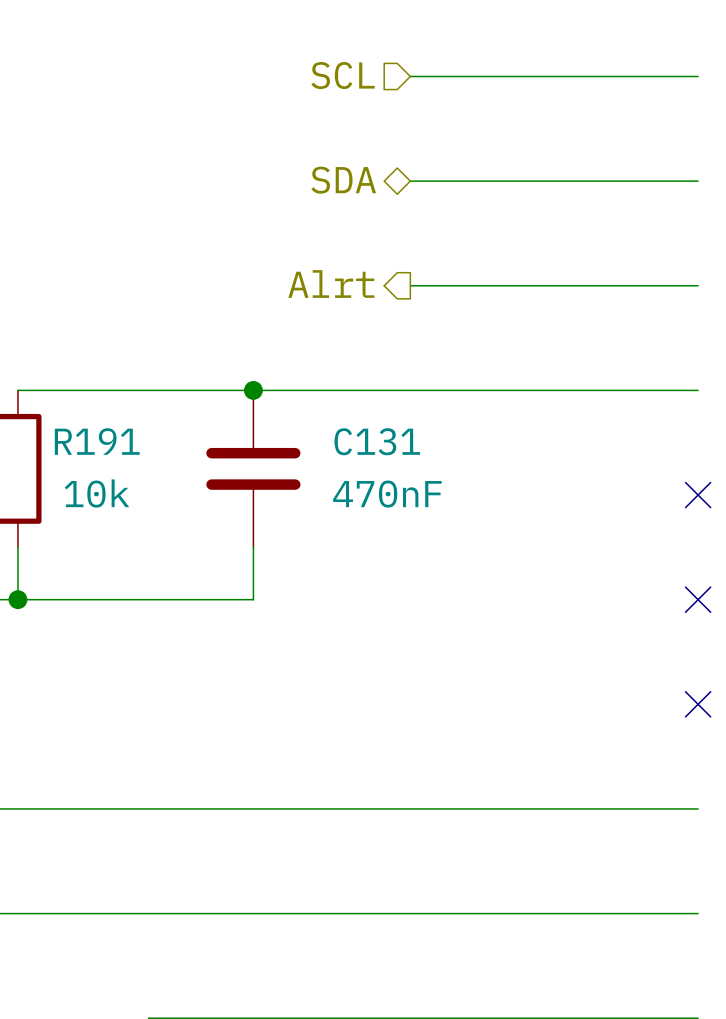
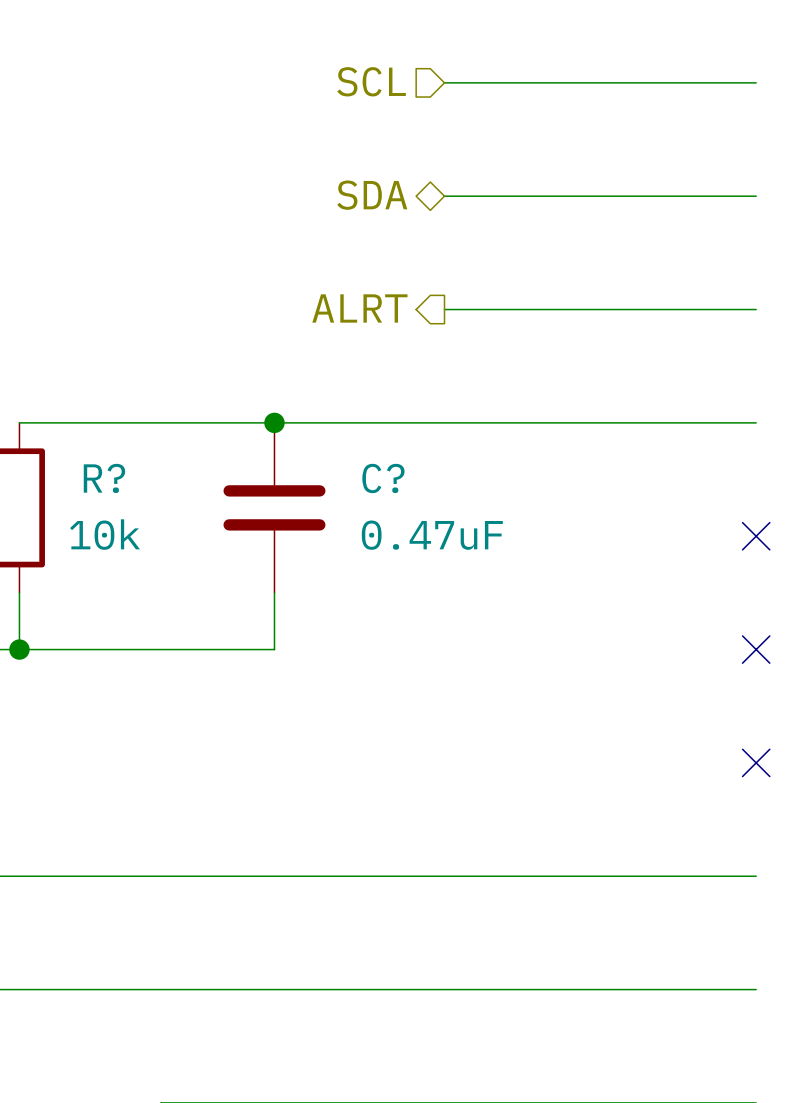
hierarchical label: Alrt (331, 284) -> ALRT (359, 308)
R191 name: R191 (97, 441) -> R? (104, 478)
C131 name: C131 (377, 441) -> C? (383, 478)
C131 value: 470nF (387, 494) -> 0.47uF (432, 535)

